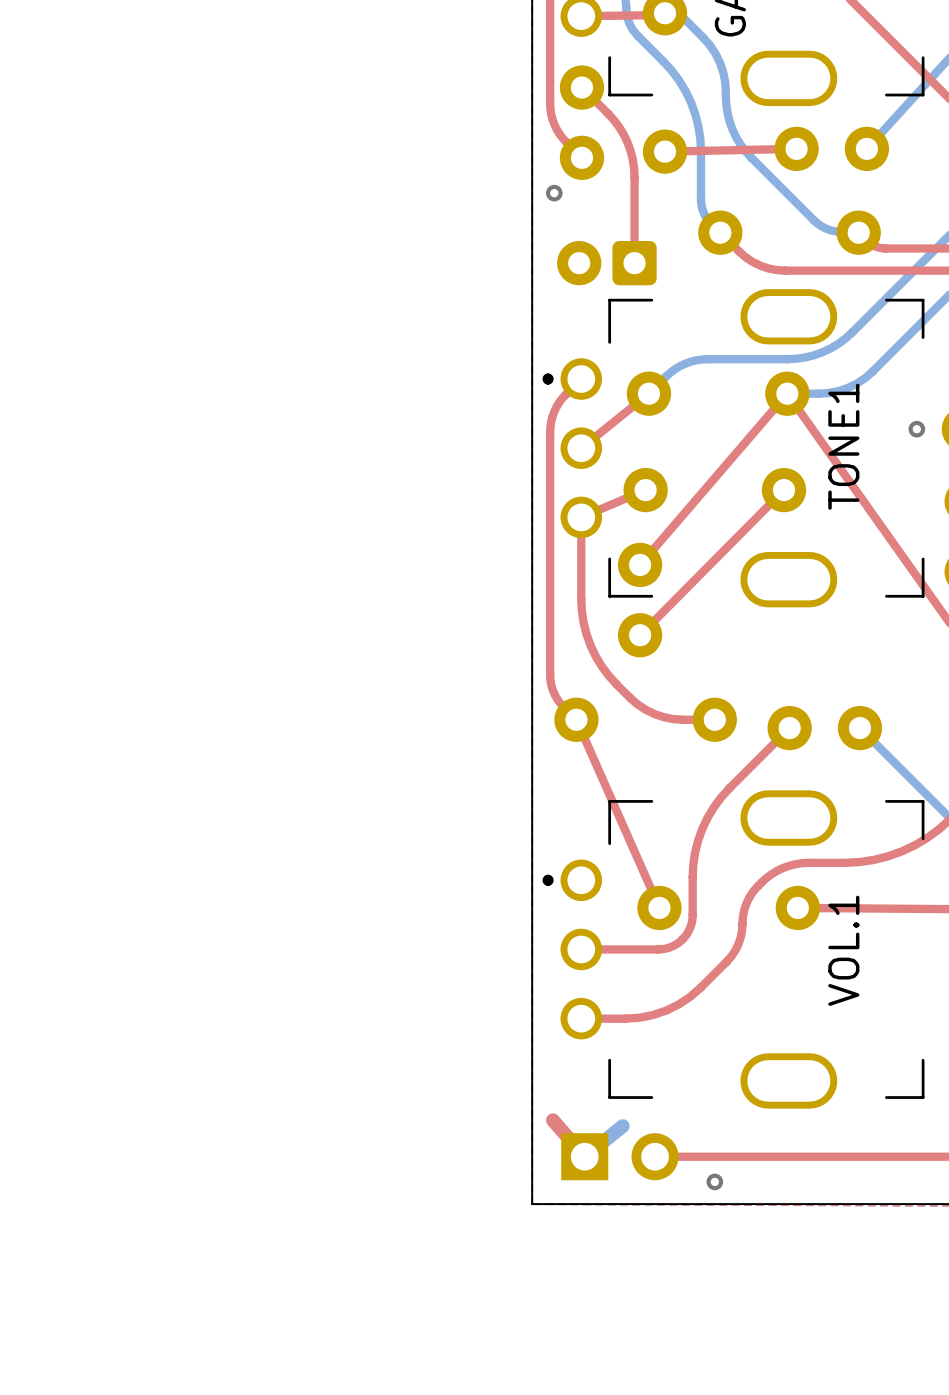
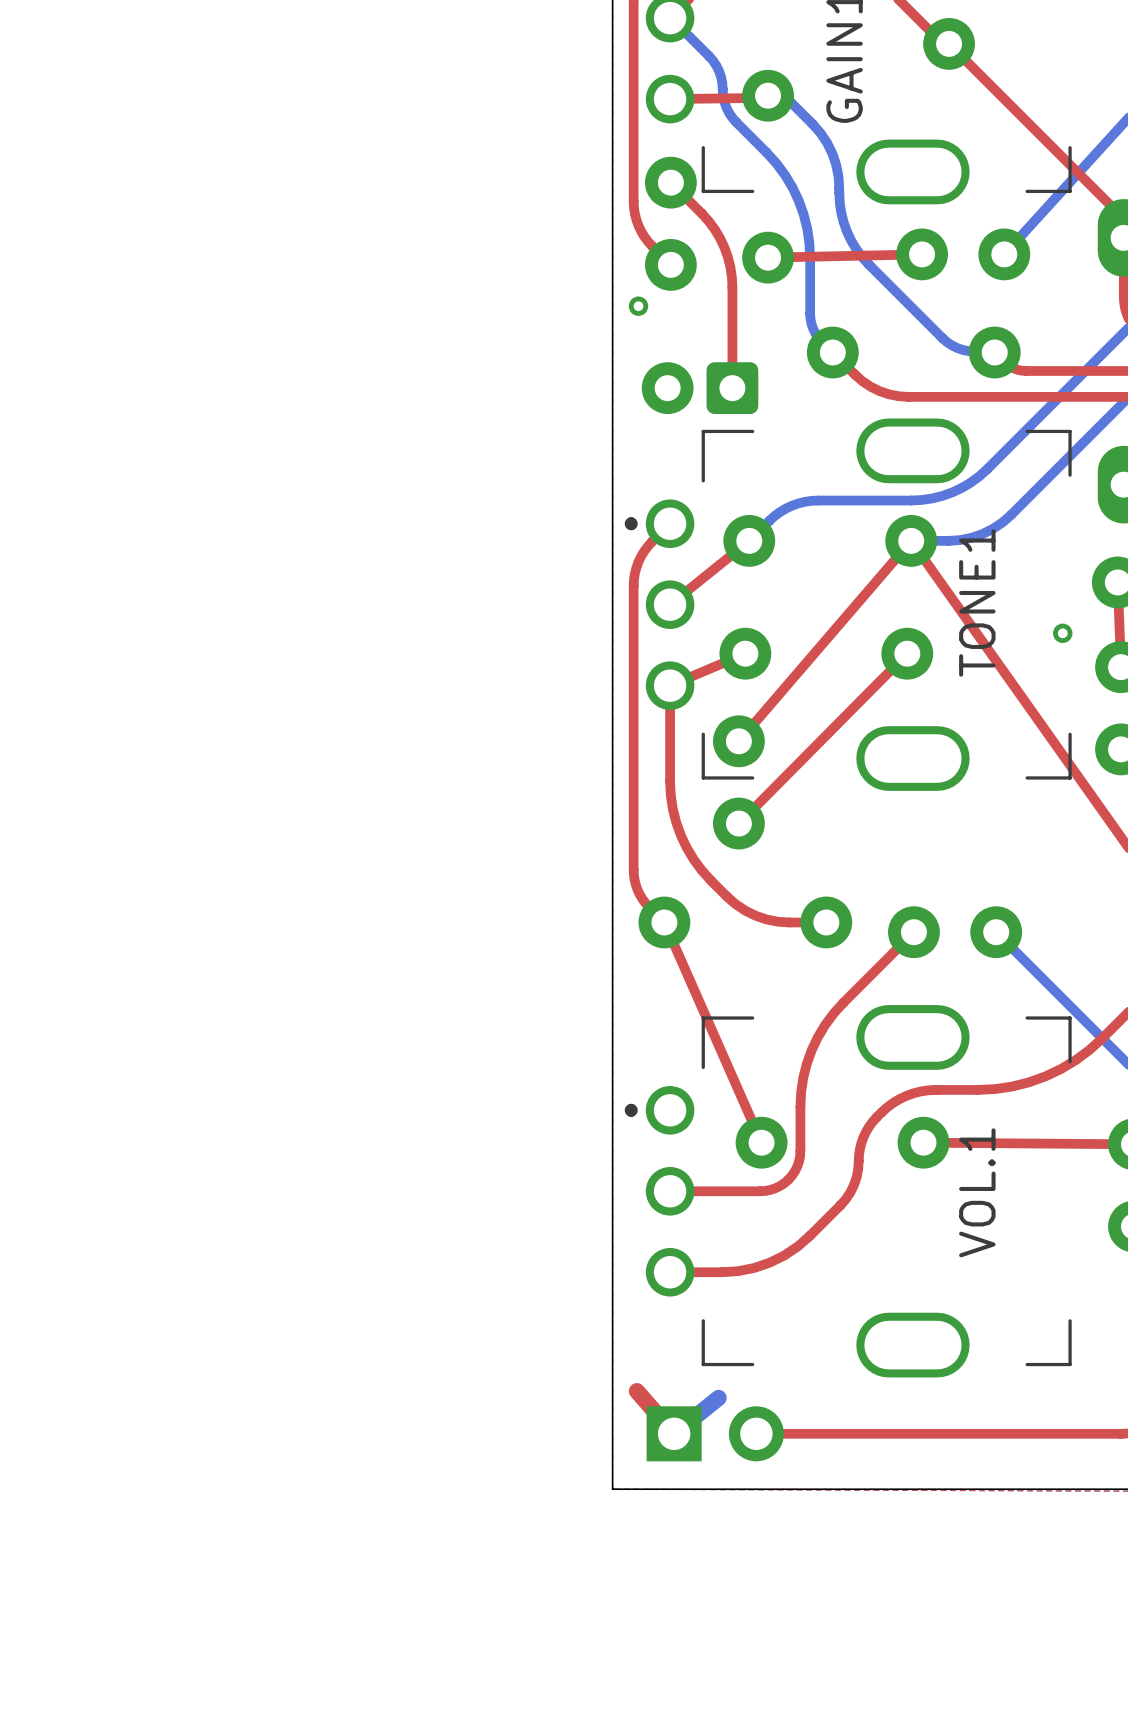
via position: (916, 429) -> (1062, 633)
via: (714, 1181) -> none

